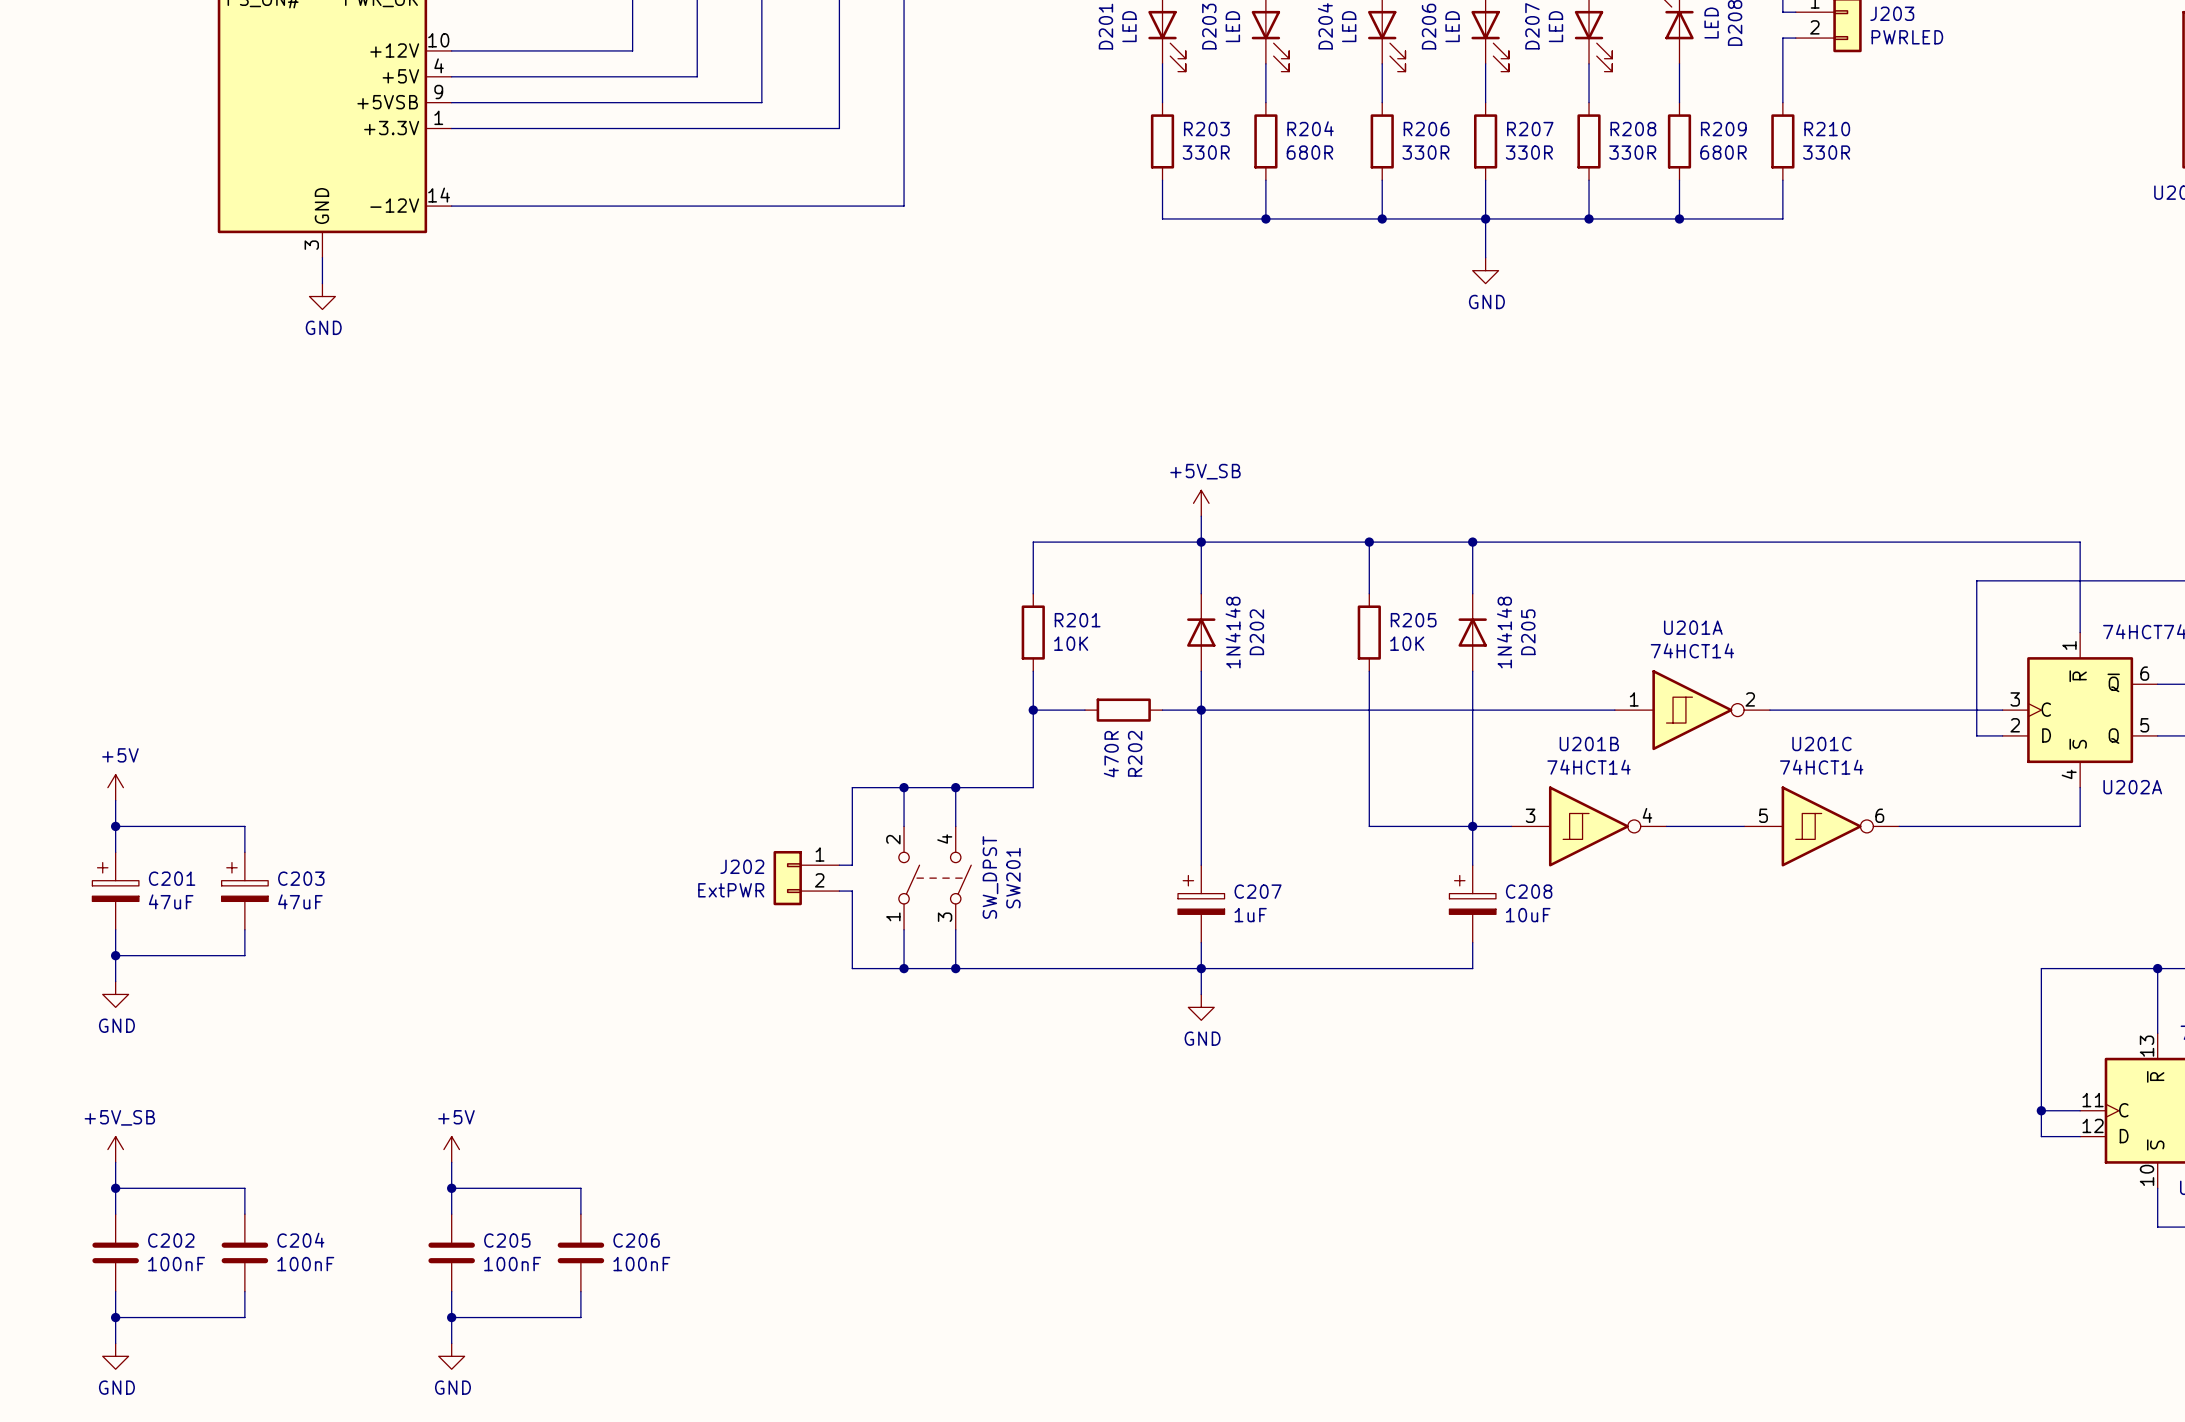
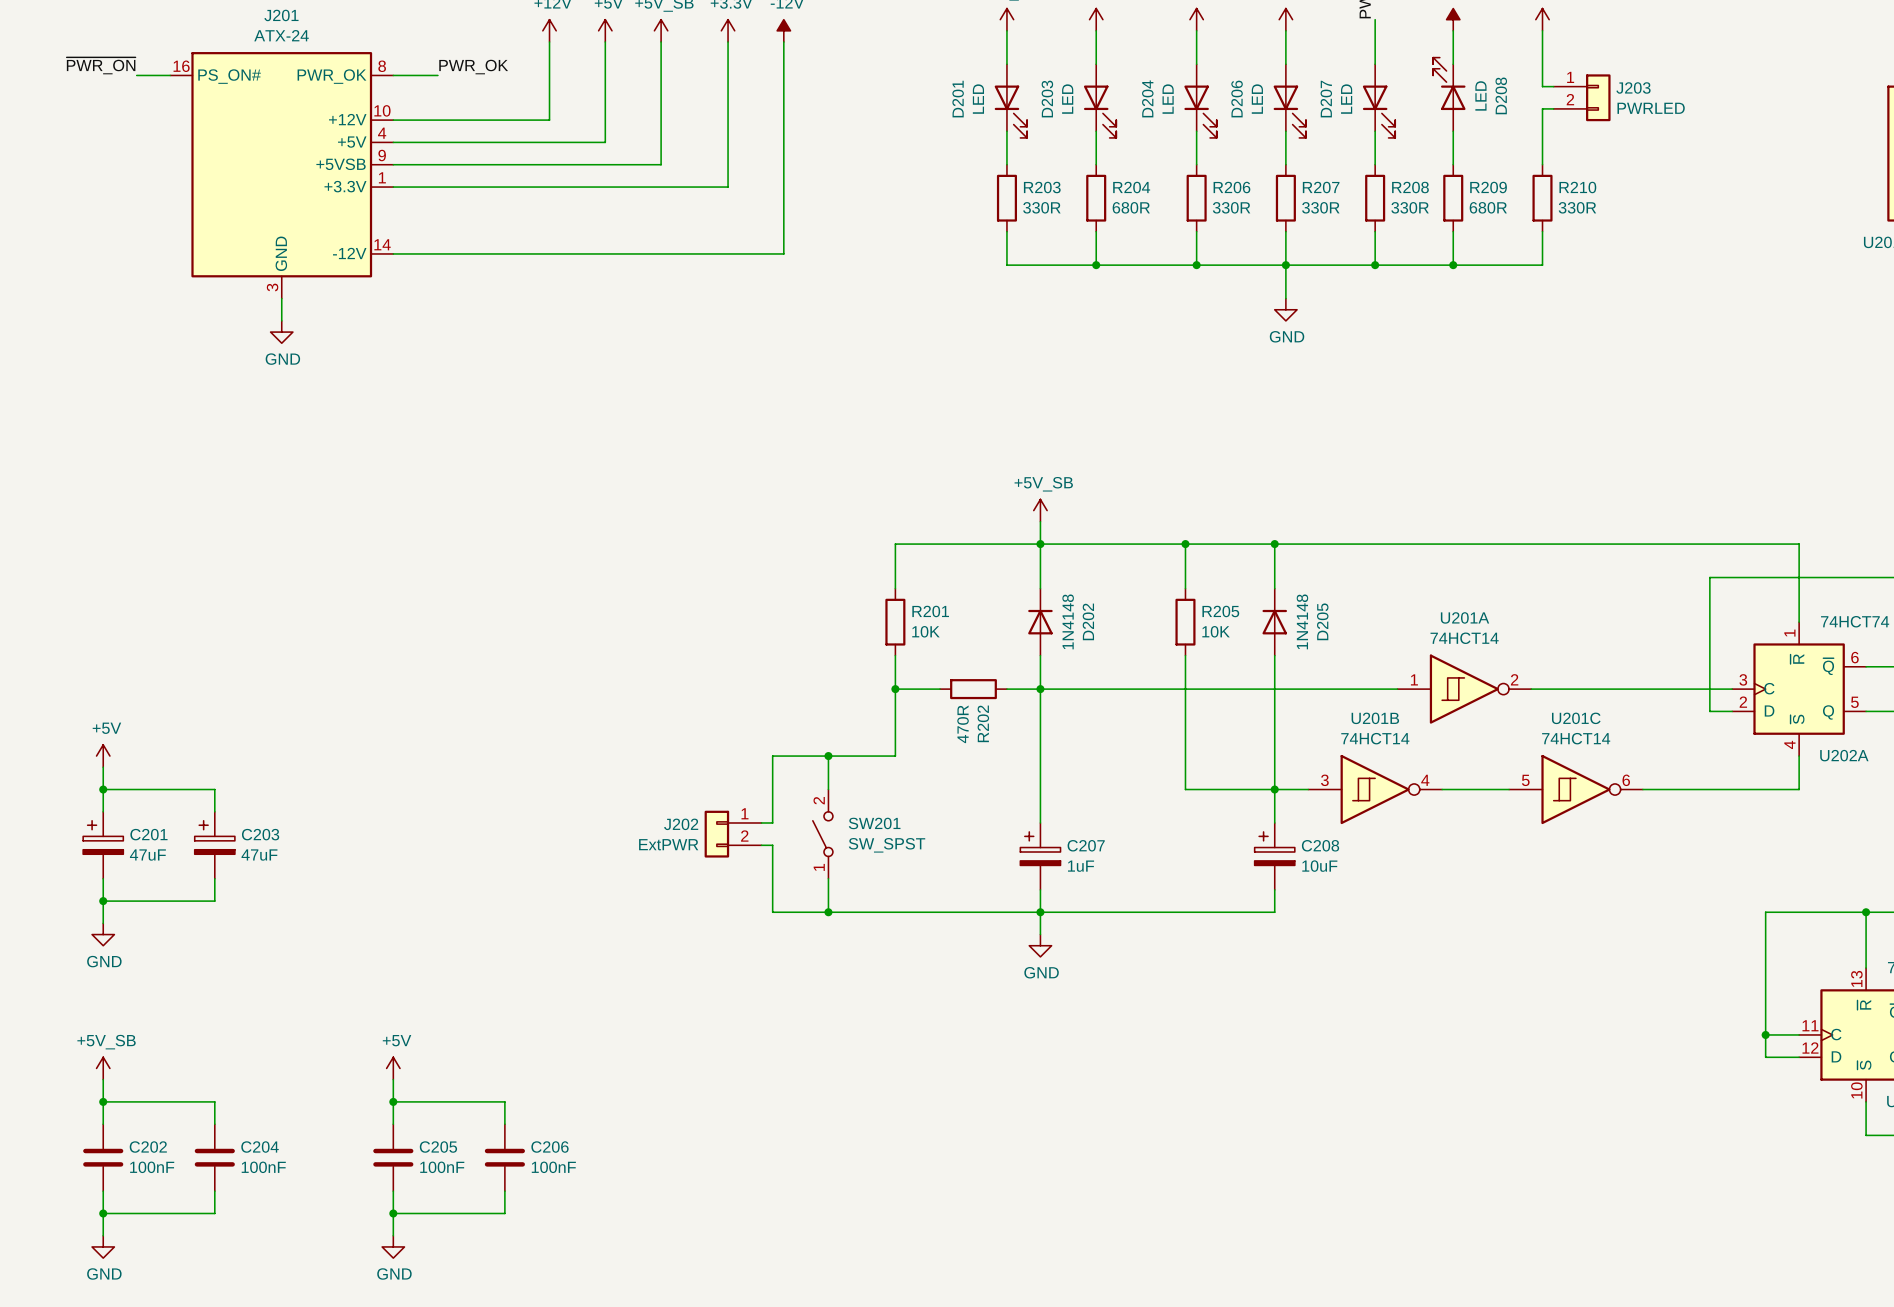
wire: (891, 787) (852, 787) (852, 865) (839, 865) -> (772, 756) (772, 822) (761, 822)
wire: (904, 787) (904, 826) -> none
junction: (904, 787) -> none
SW201 symbol: [898, 826, 972, 930] -> [812, 789, 833, 879]
SW201 value: SW_DPST (990, 877) -> SW_SPST (887, 845)
J202 position: (806, 878) -> (733, 834)
wire: (839, 891) (852, 891) (852, 968) (891, 968) -> (761, 845) (772, 845) (772, 912)
wire: (904, 929) (904, 968) -> none
junction: (904, 968) -> none

